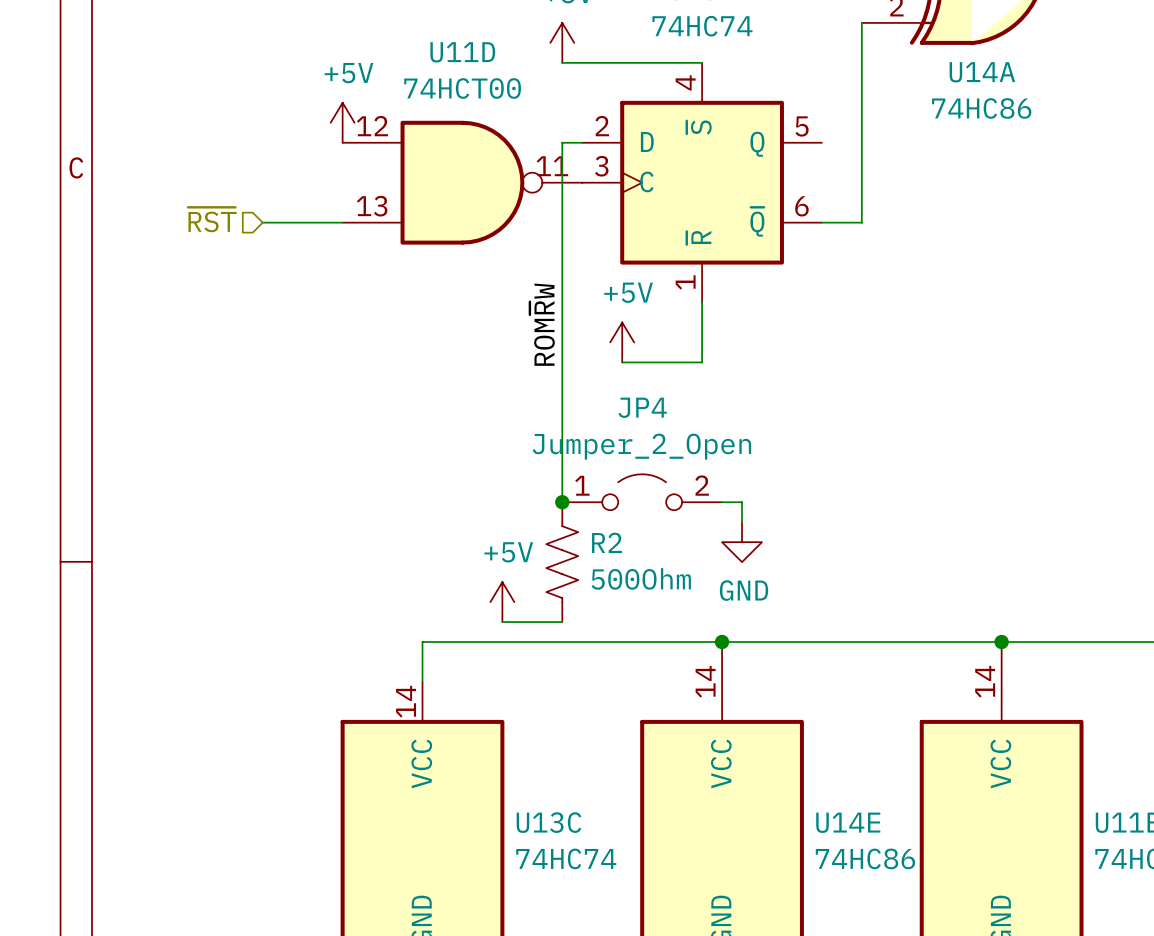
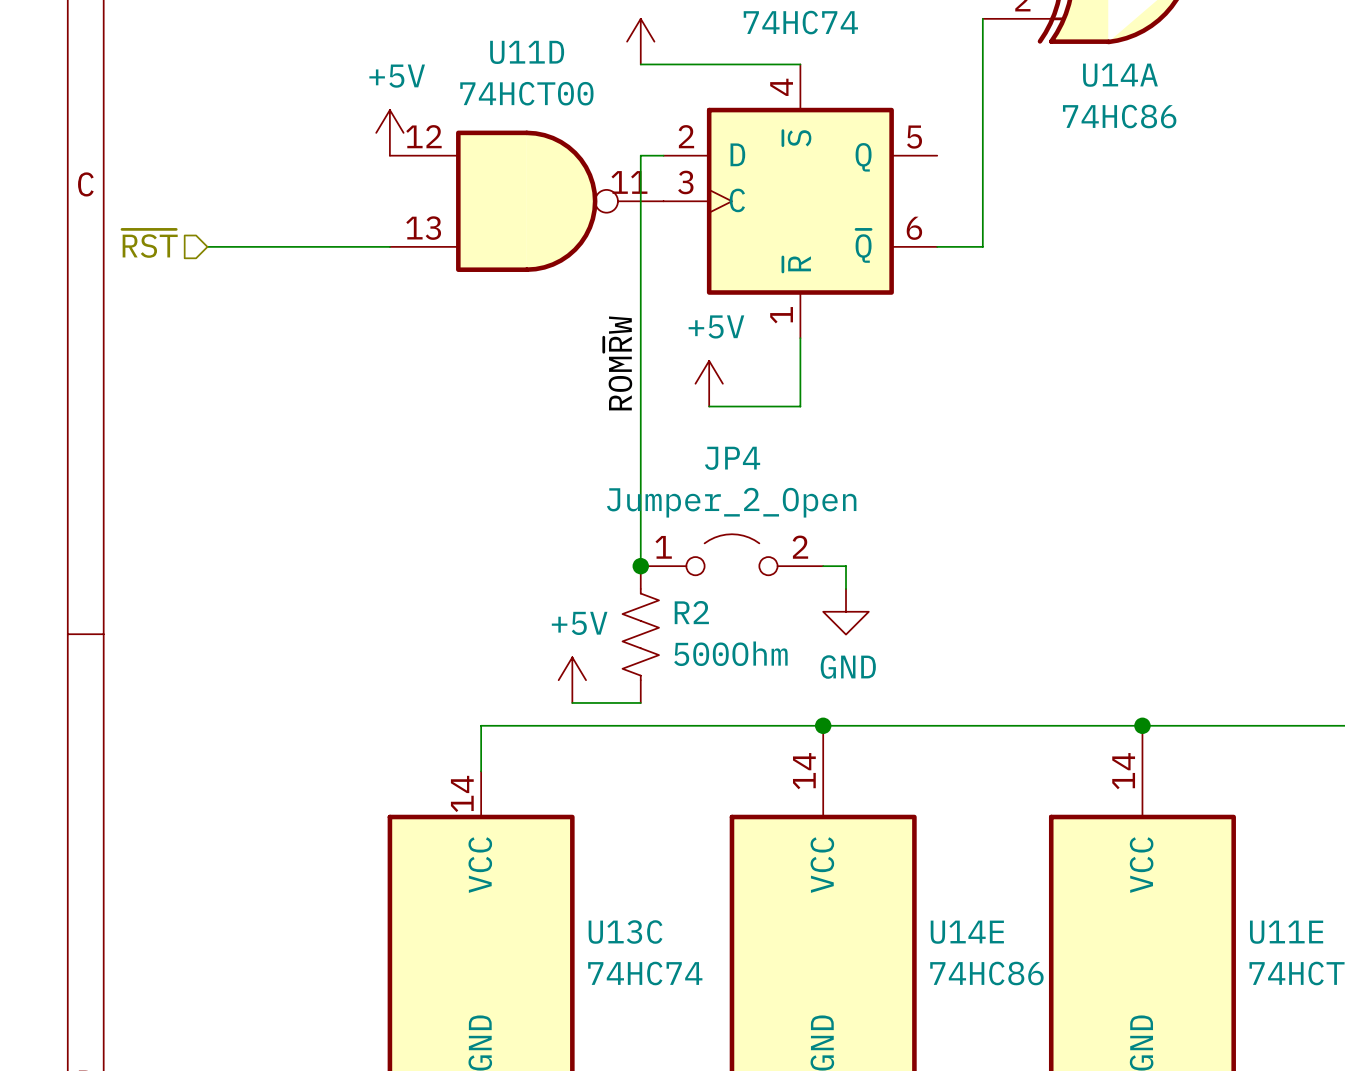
hierarchical label position: ~{RST} (212, 219) -> ~{RST} (149, 243)
wire: none -> (207, 246) (298, 246)

